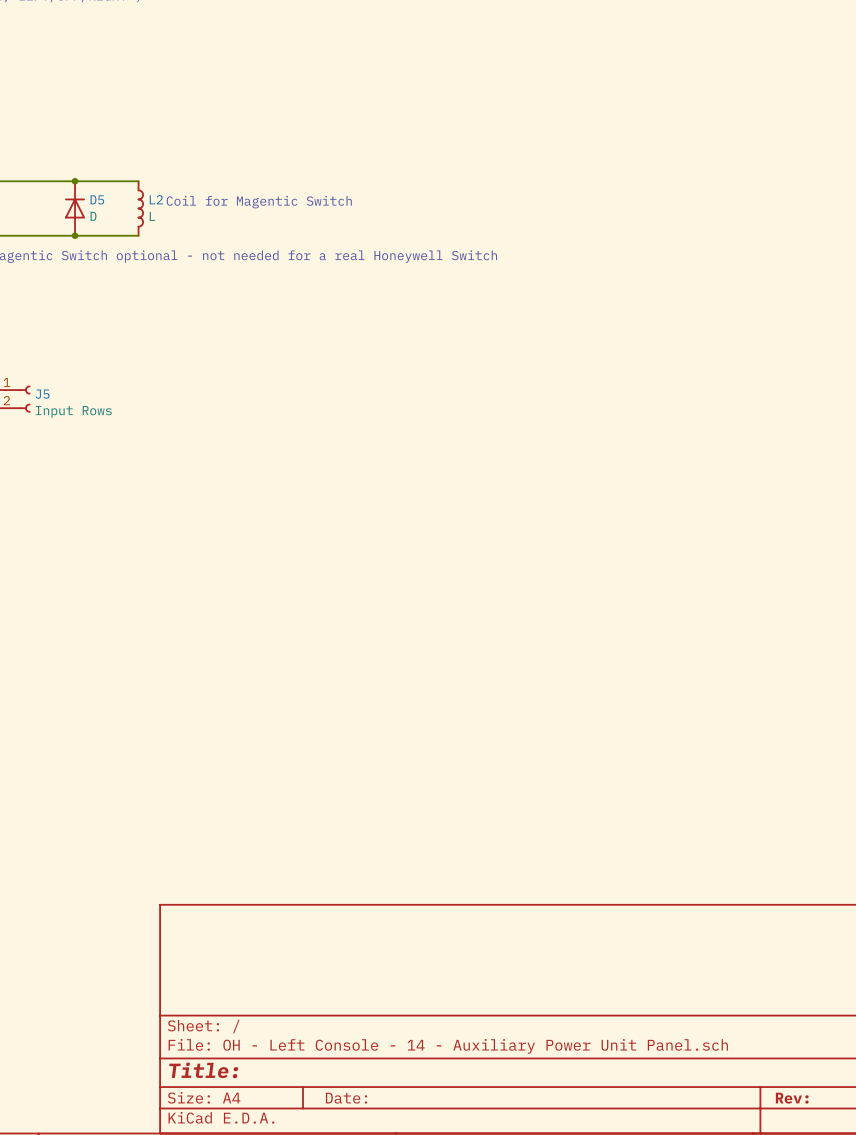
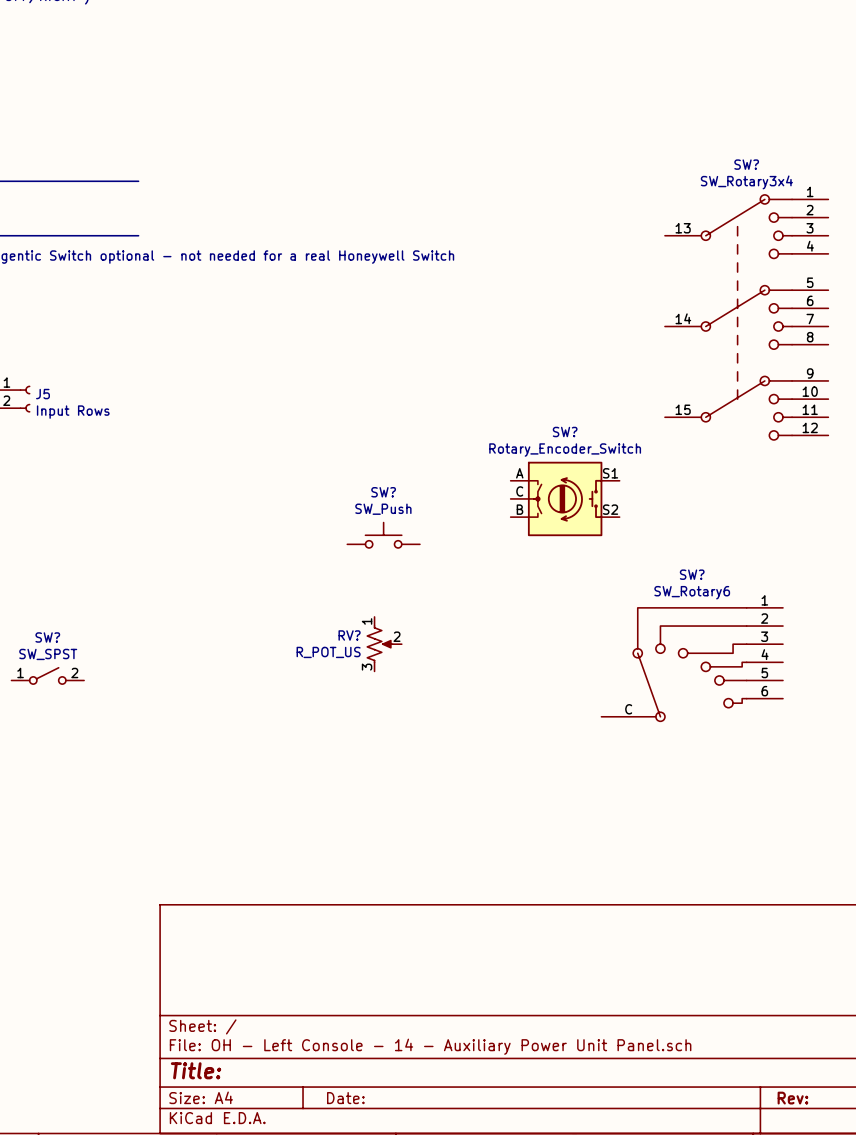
junction: (75, 181) -> none
text: Coil for Magentic Switch (259, 202) -> none
D5: D (75, 208) -> none
L2: L (140, 208) -> none
junction: (75, 235) -> none
SW?: none -> SW_Rotary3x4 (746, 317)
SW?: none -> Rotary_Encoder_Switch (565, 498)
SW?: none -> SW_Push (383, 535)
RV?: none -> R_POT_US (384, 644)
SW?: none -> SW_Rotary6 (692, 664)
SW?: none -> SW_SPST (47, 675)

